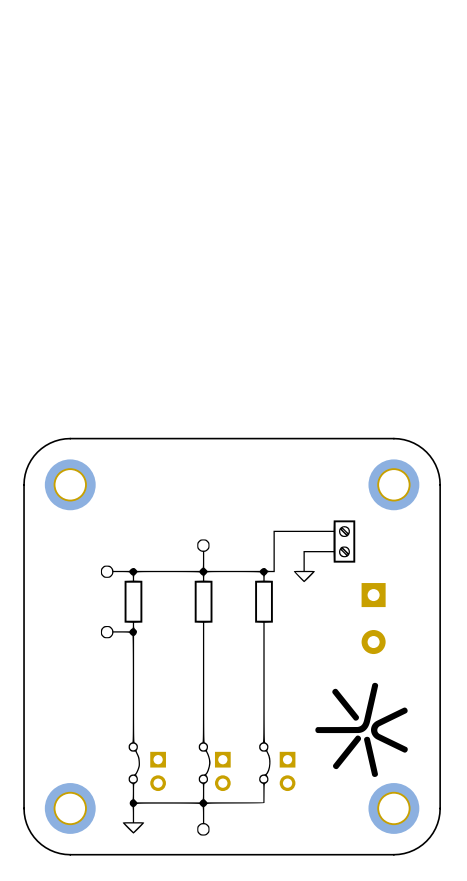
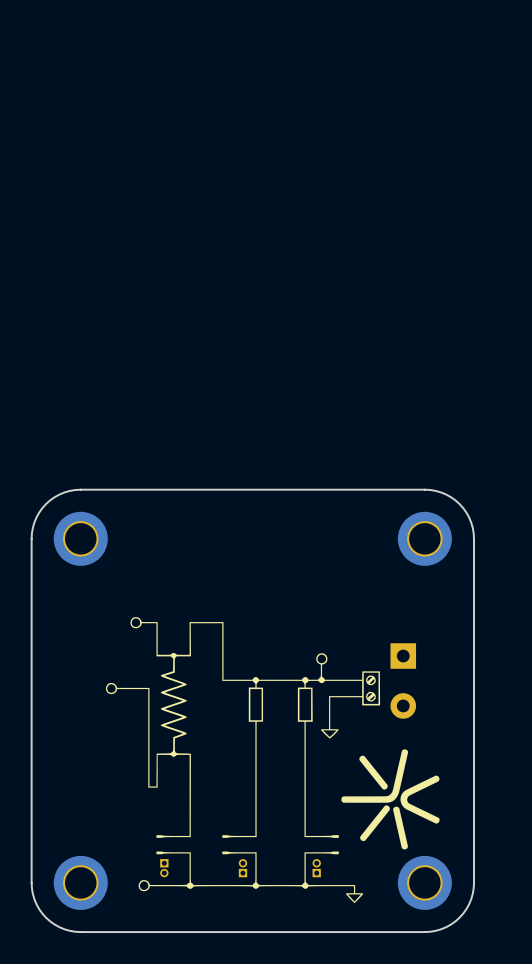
drawing: [100, 520, 356, 836] -> none
drawing: none -> [105, 617, 381, 903]
part: (158, 771) -> none
part: (222, 771) -> none
part: (287, 771) -> none
part: none -> (164, 868)
part: none -> (242, 868)
part: none -> (316, 868)

